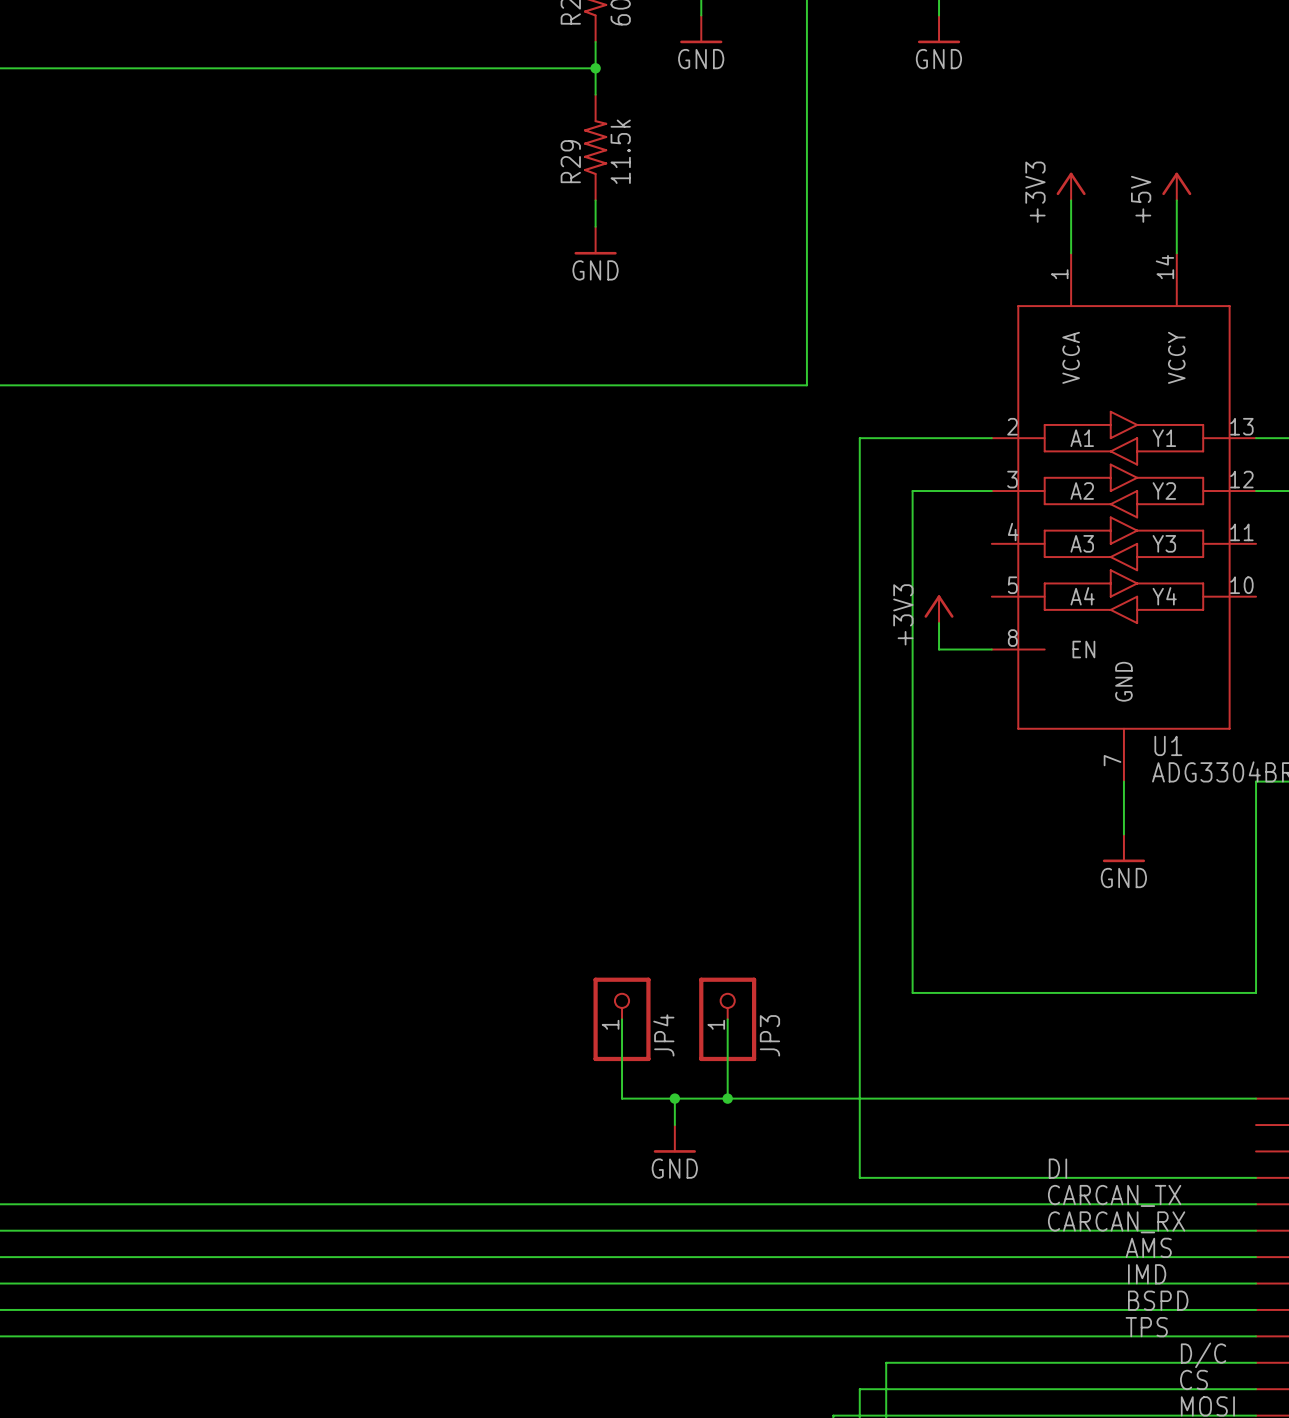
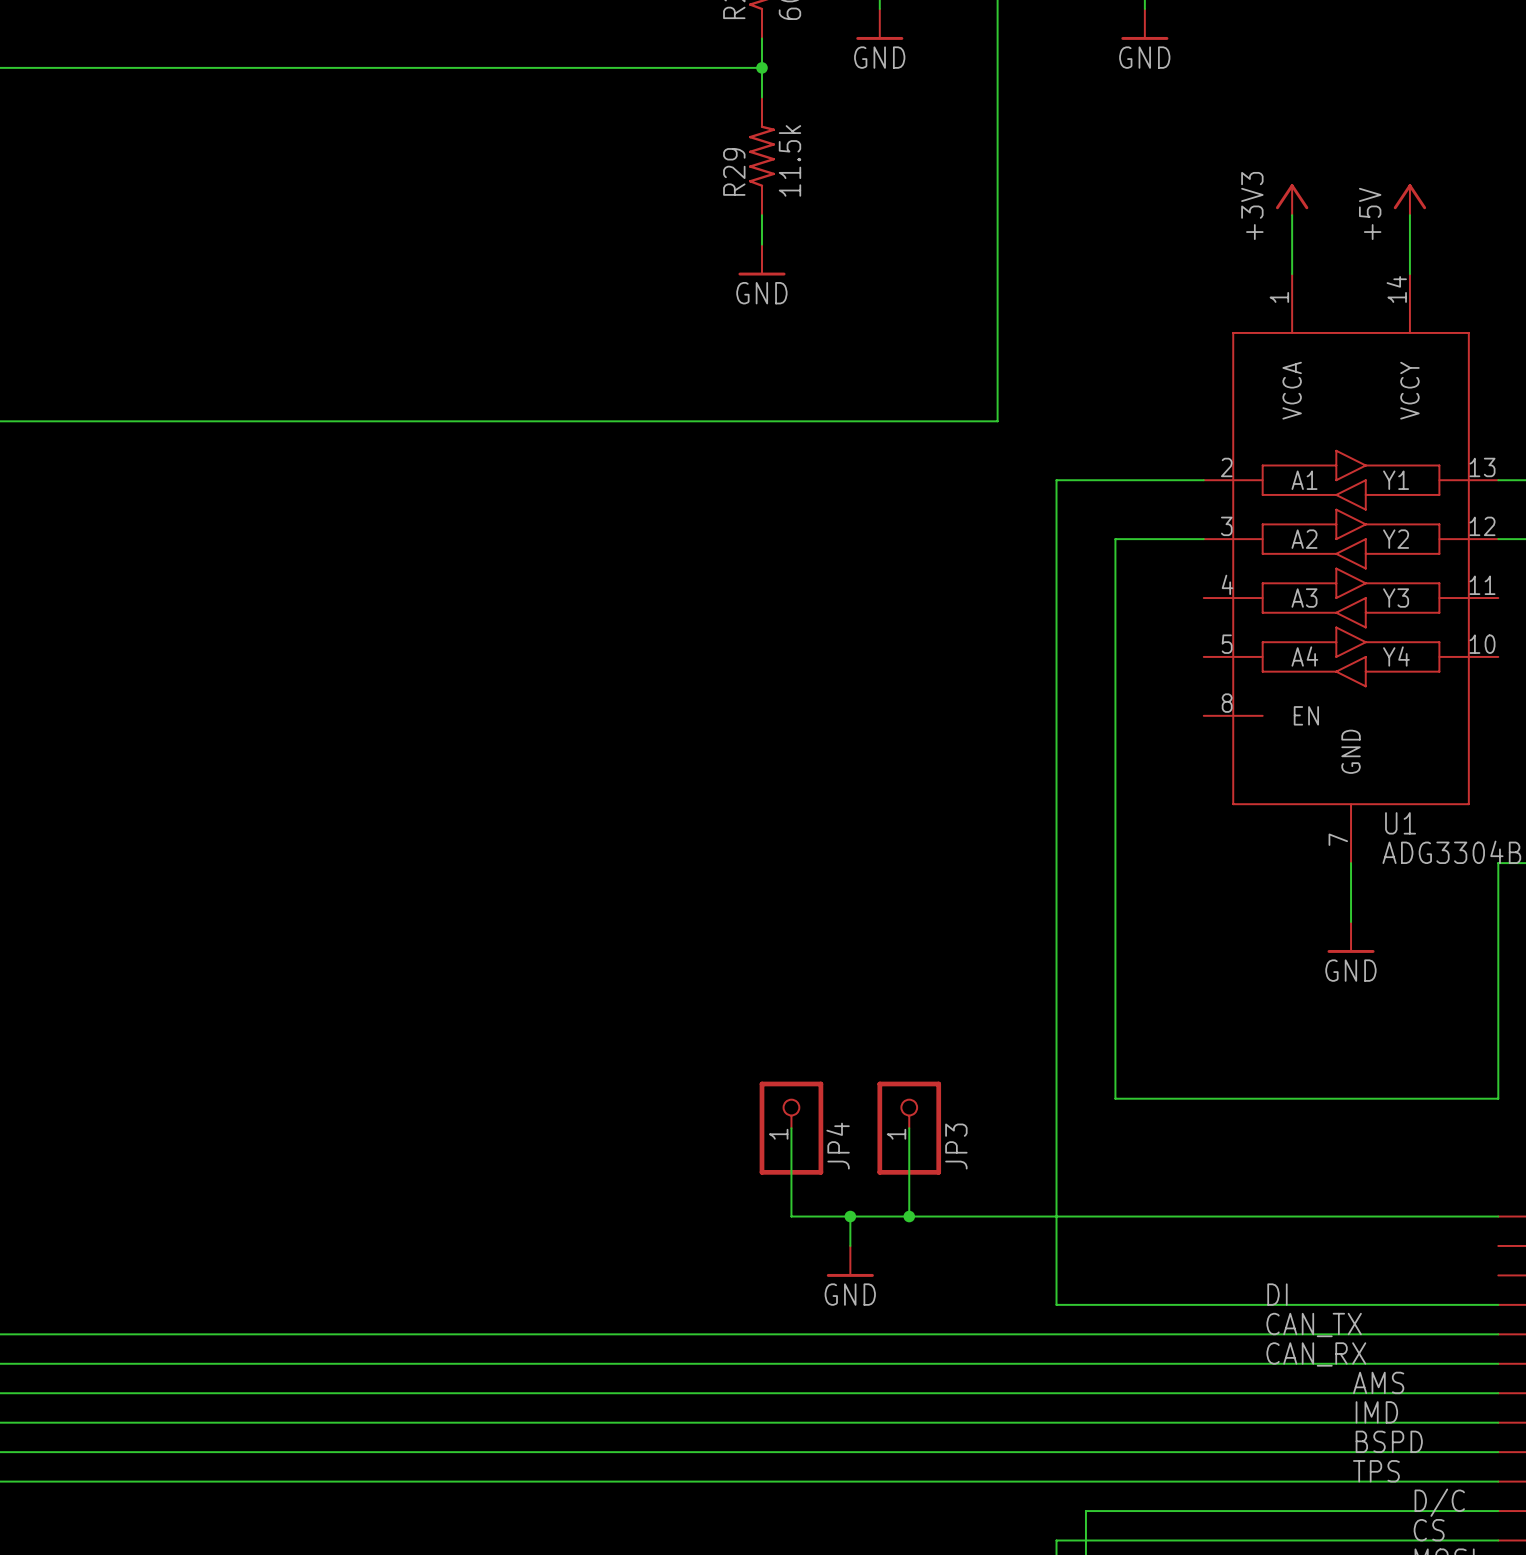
power symbol: +3V3 (939, 609) -> none
wire: (939, 623) (939, 649) (991, 649) -> none
label: CARCAN_TX (1114, 1195) -> CAN_TX (1314, 1325)
label: CARCAN_RX (1116, 1222) -> CAN_RX (1316, 1354)

